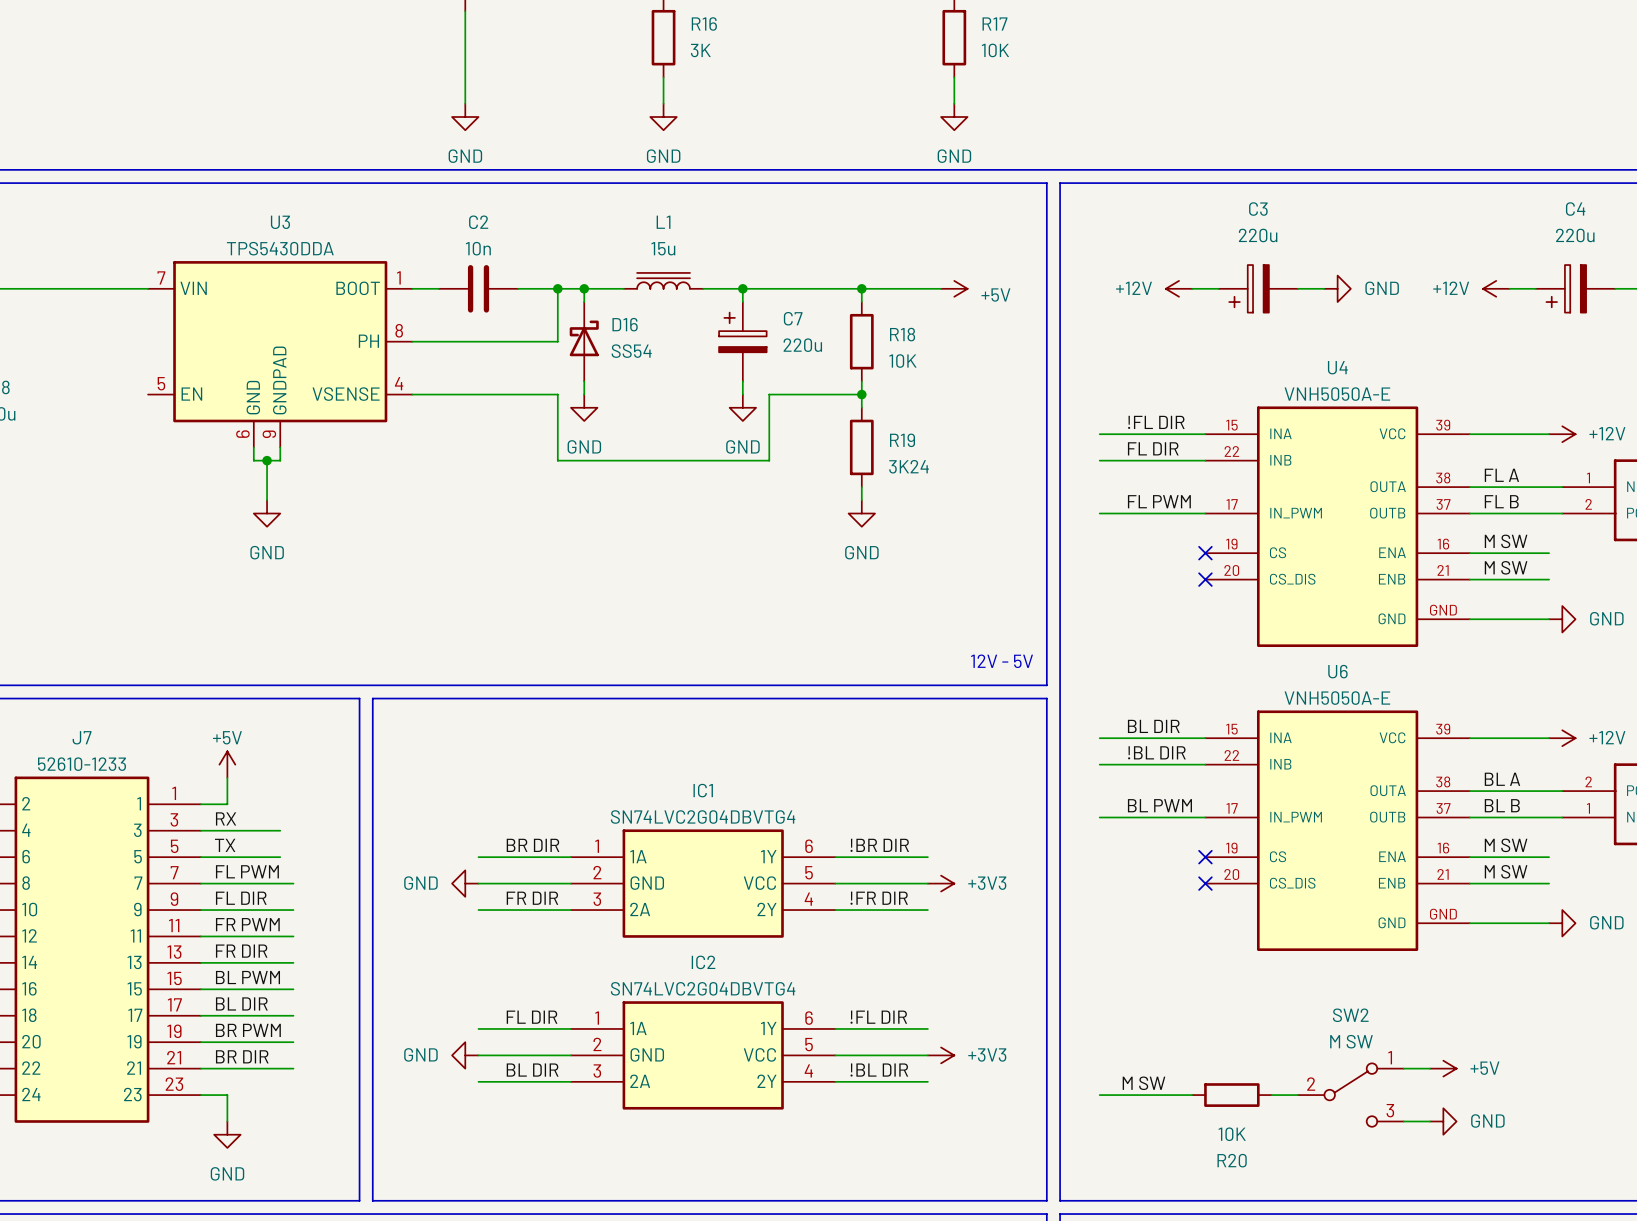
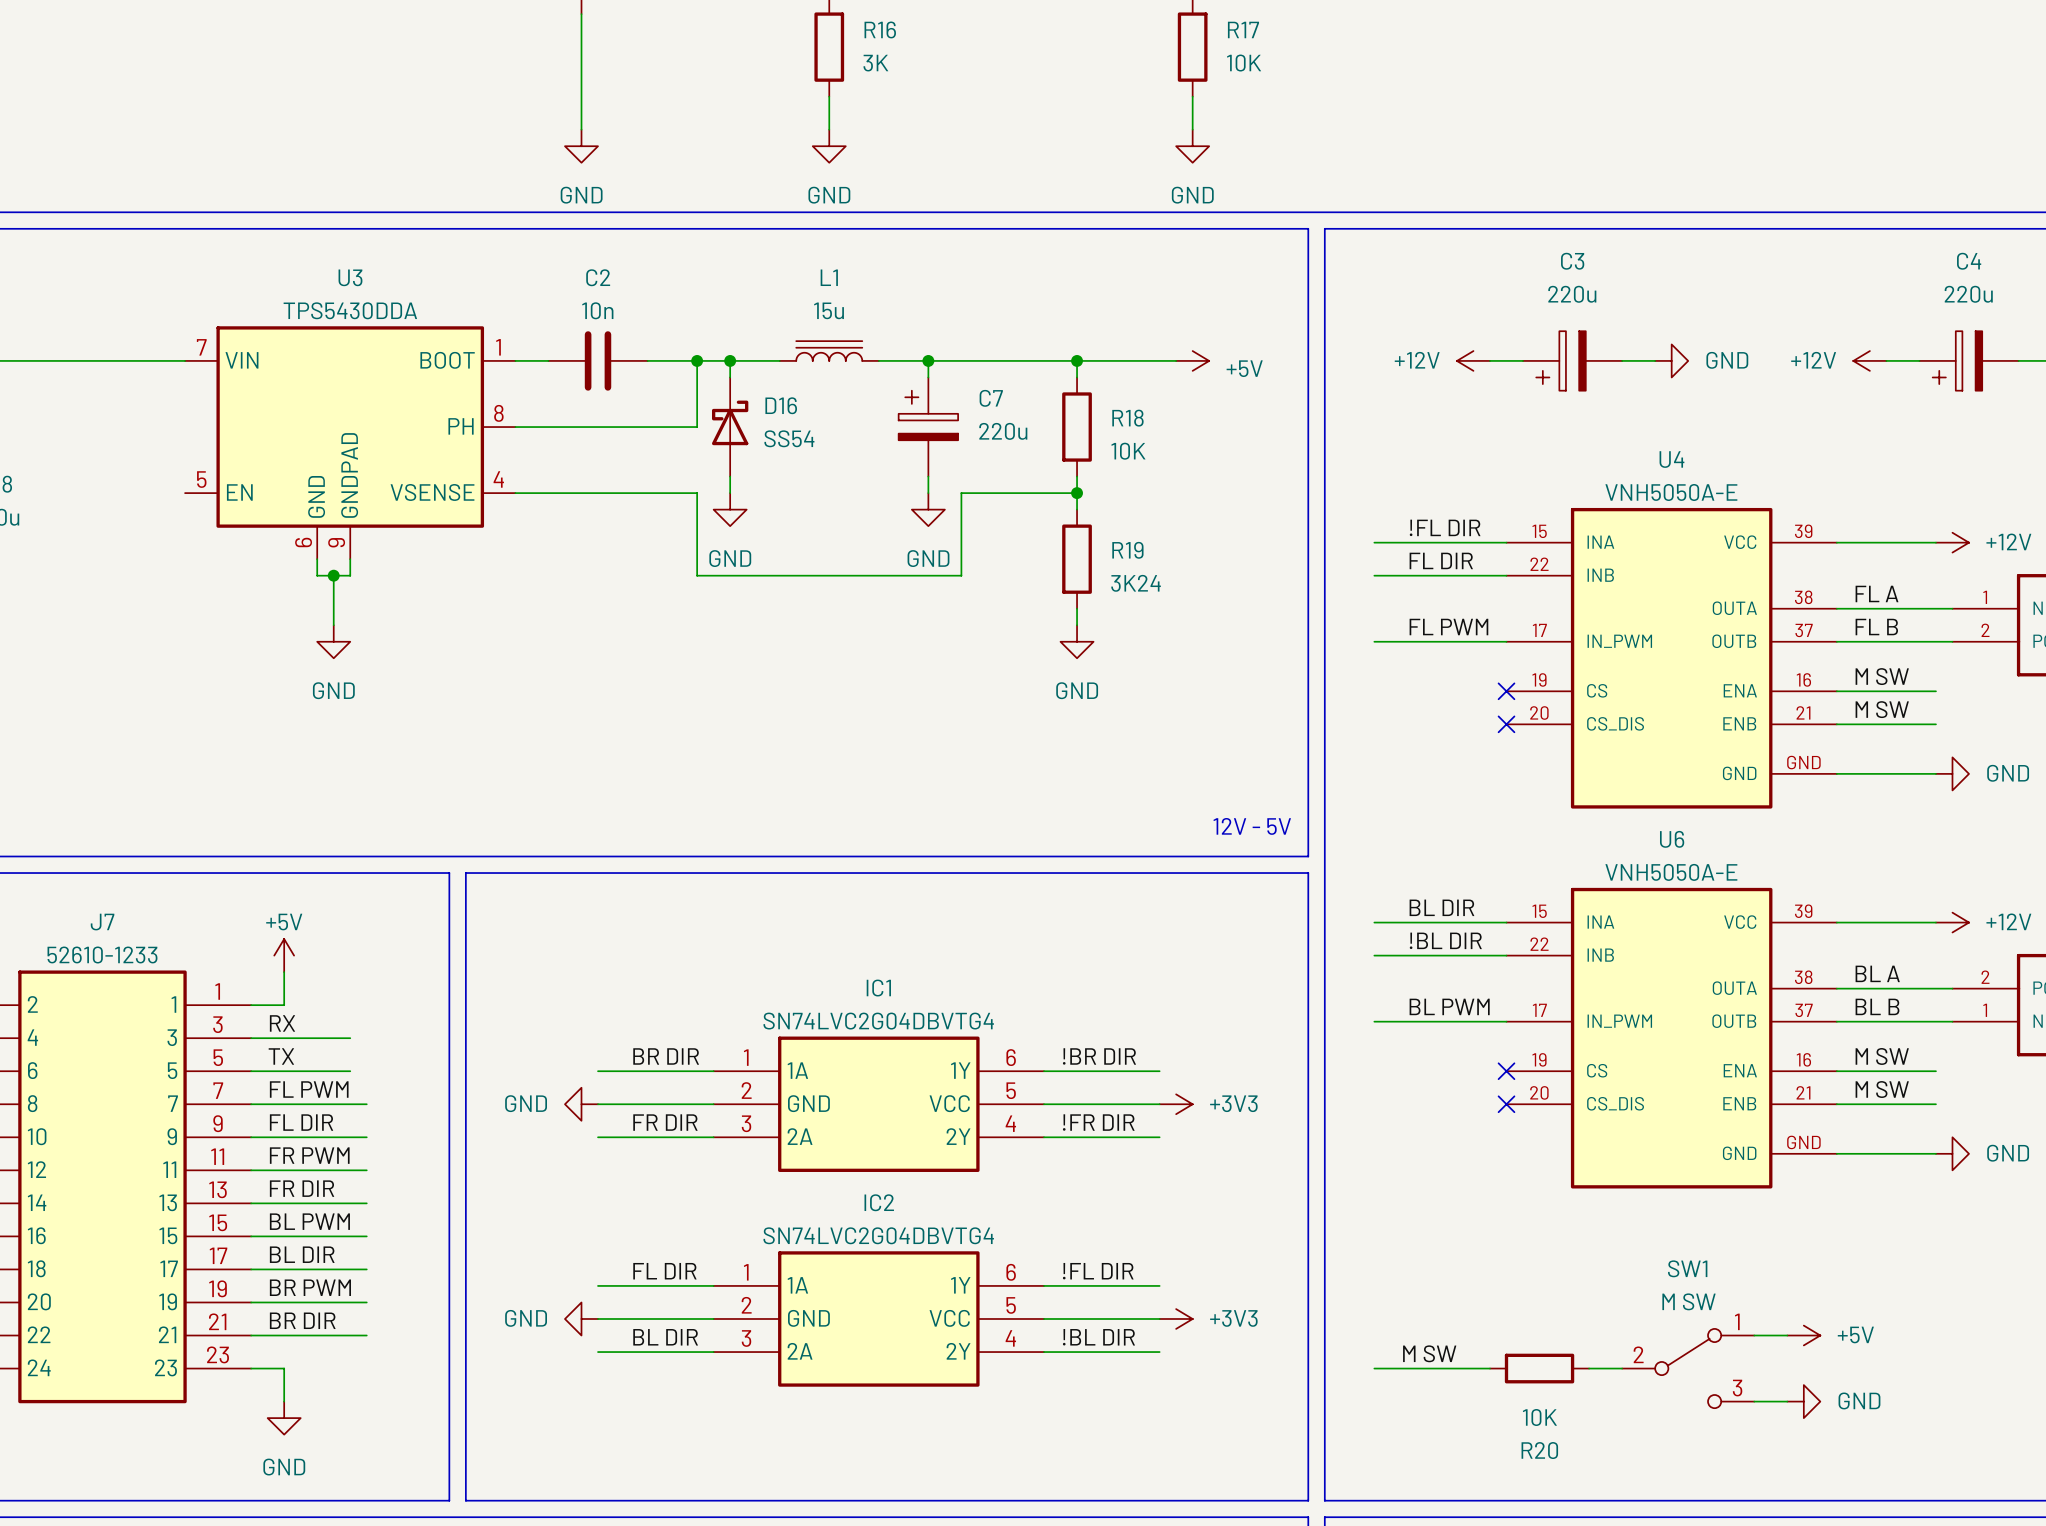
SW2 name: SW2 (1350, 1015) -> SW1 (1687, 1268)

